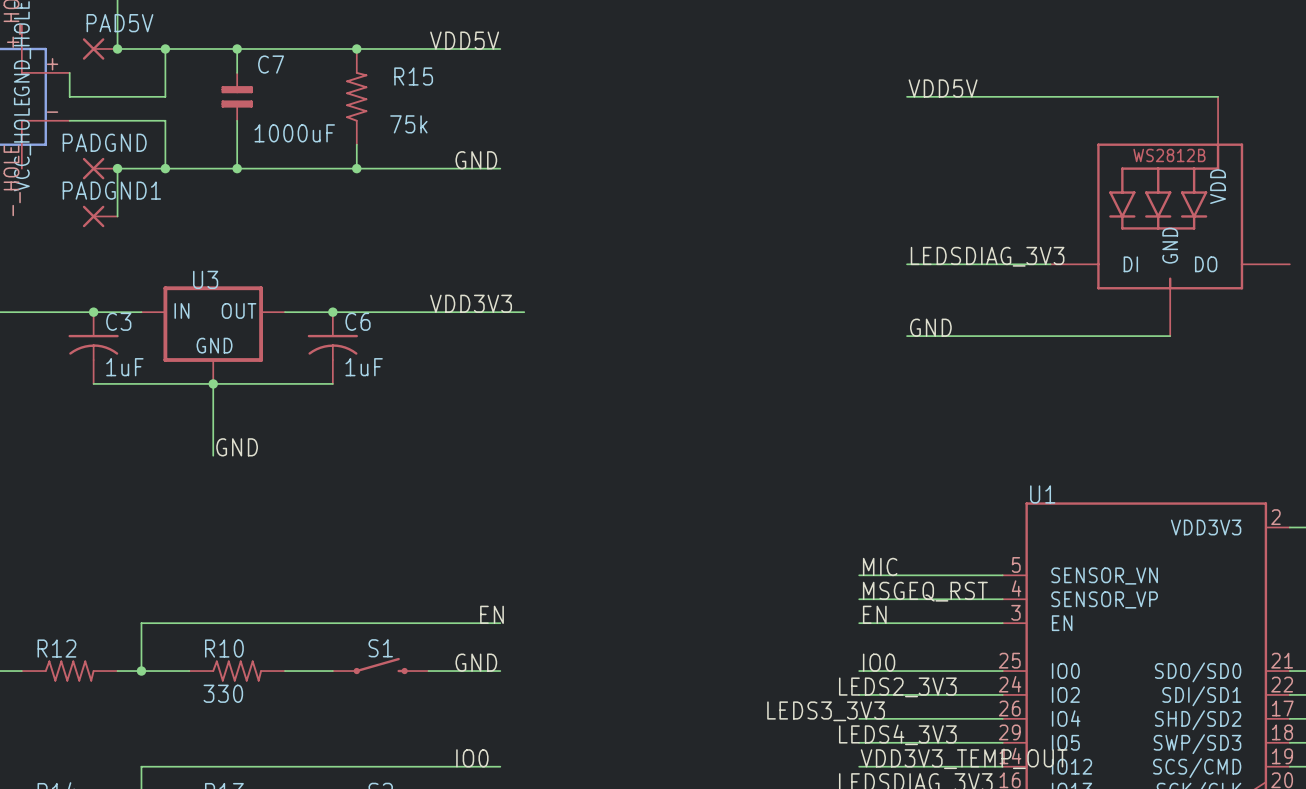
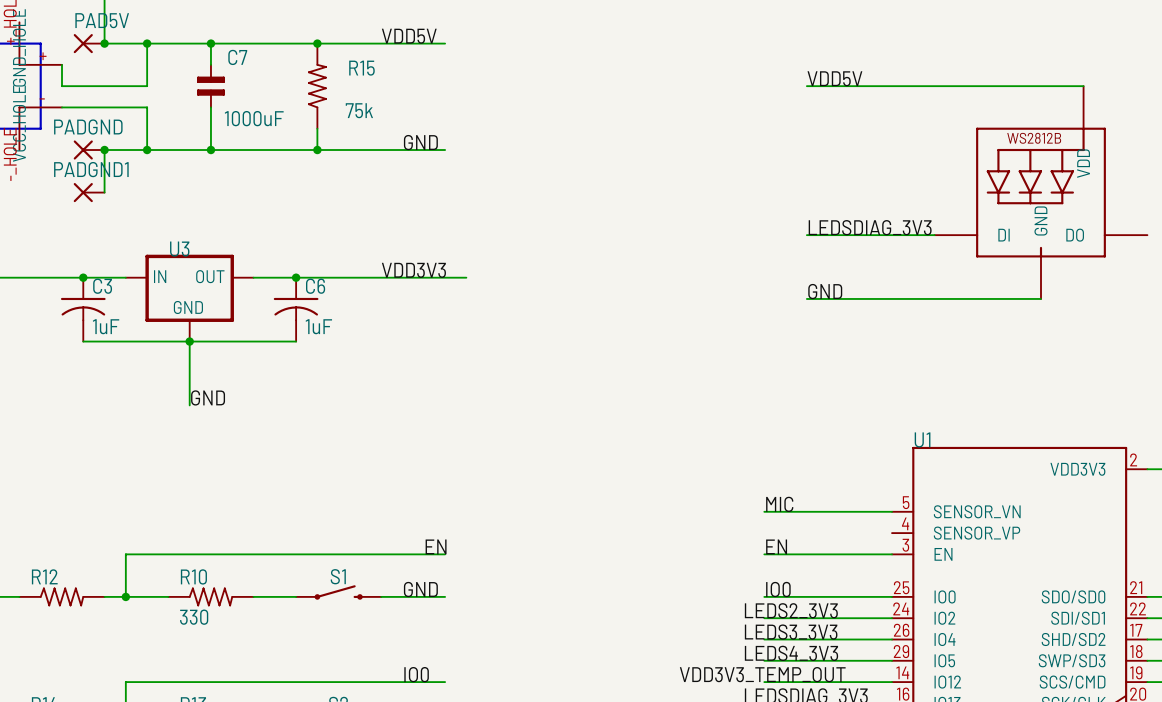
label: MSGEQ_RST (925, 591) -> none
wire: (859, 599) (1002, 599) -> none
label position: LEDS3_3V3 (826, 711) -> LEDS3_3V3 (791, 632)
label position: VDD3V3_TEMP_OUT (964, 759) -> VDD3V3_TEMP_OUT (762, 674)

